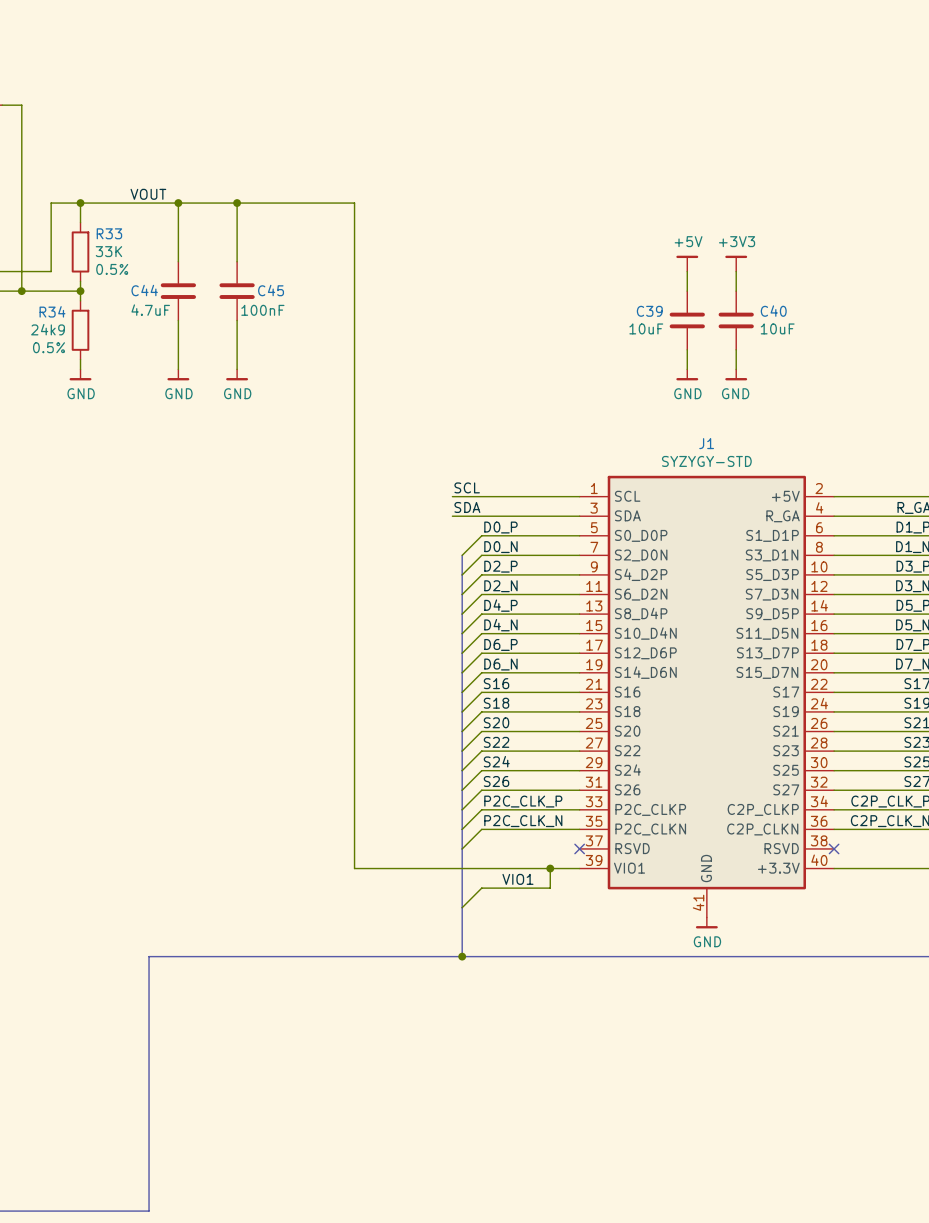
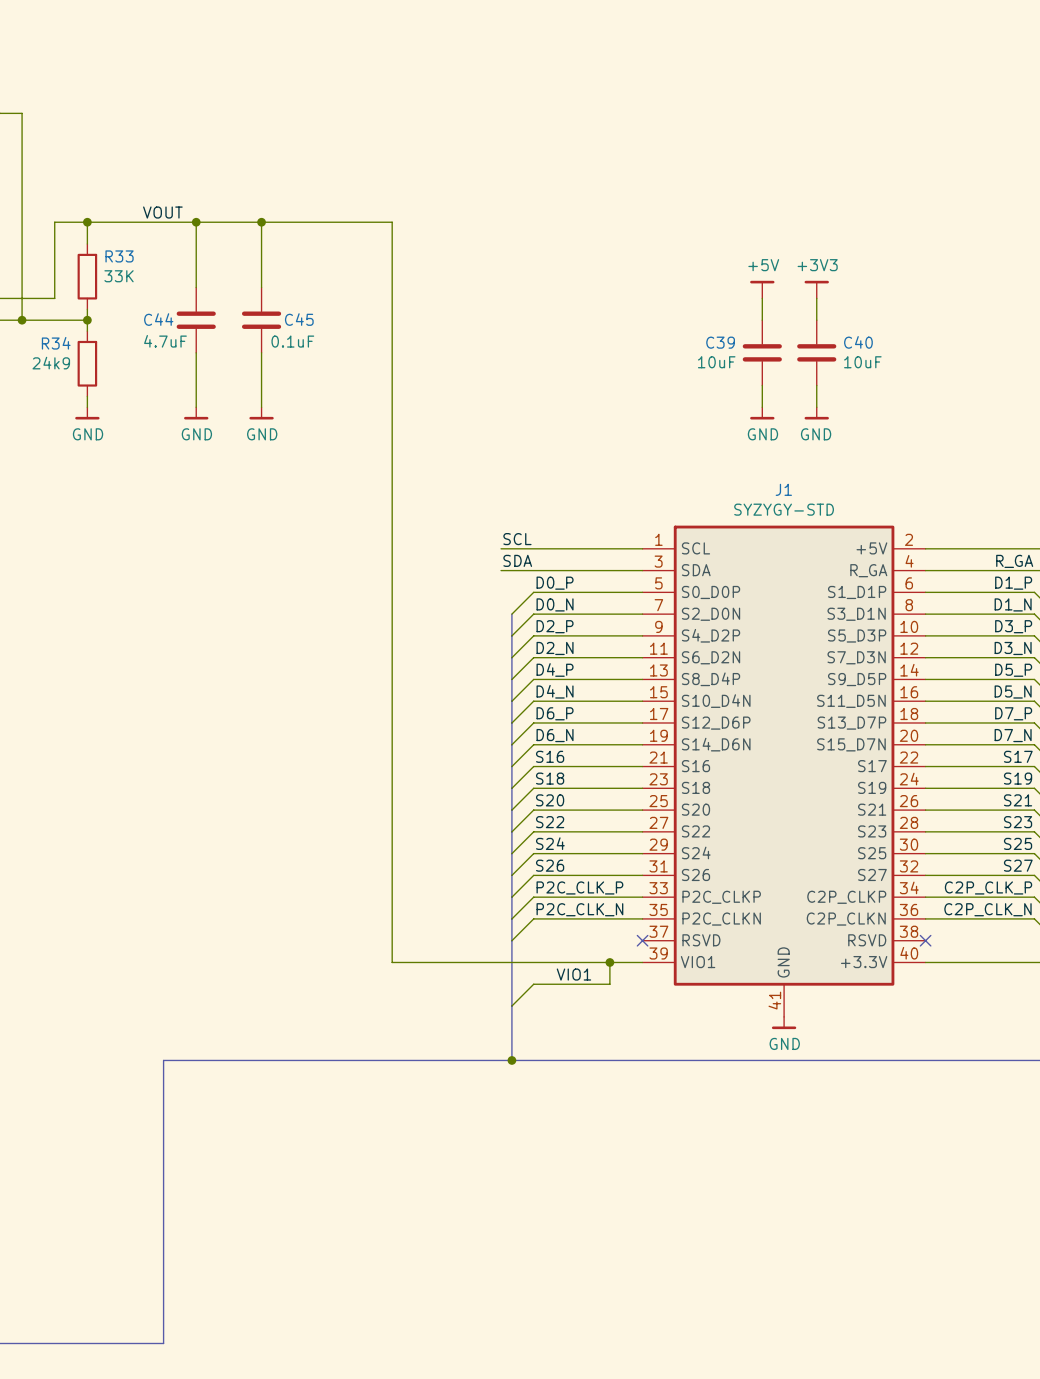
R33 text: 0.5% (112, 269) -> none
C45 value: 100nF (262, 310) -> 0.1uF (292, 341)
R34 text: 0.5% (48, 347) -> none

